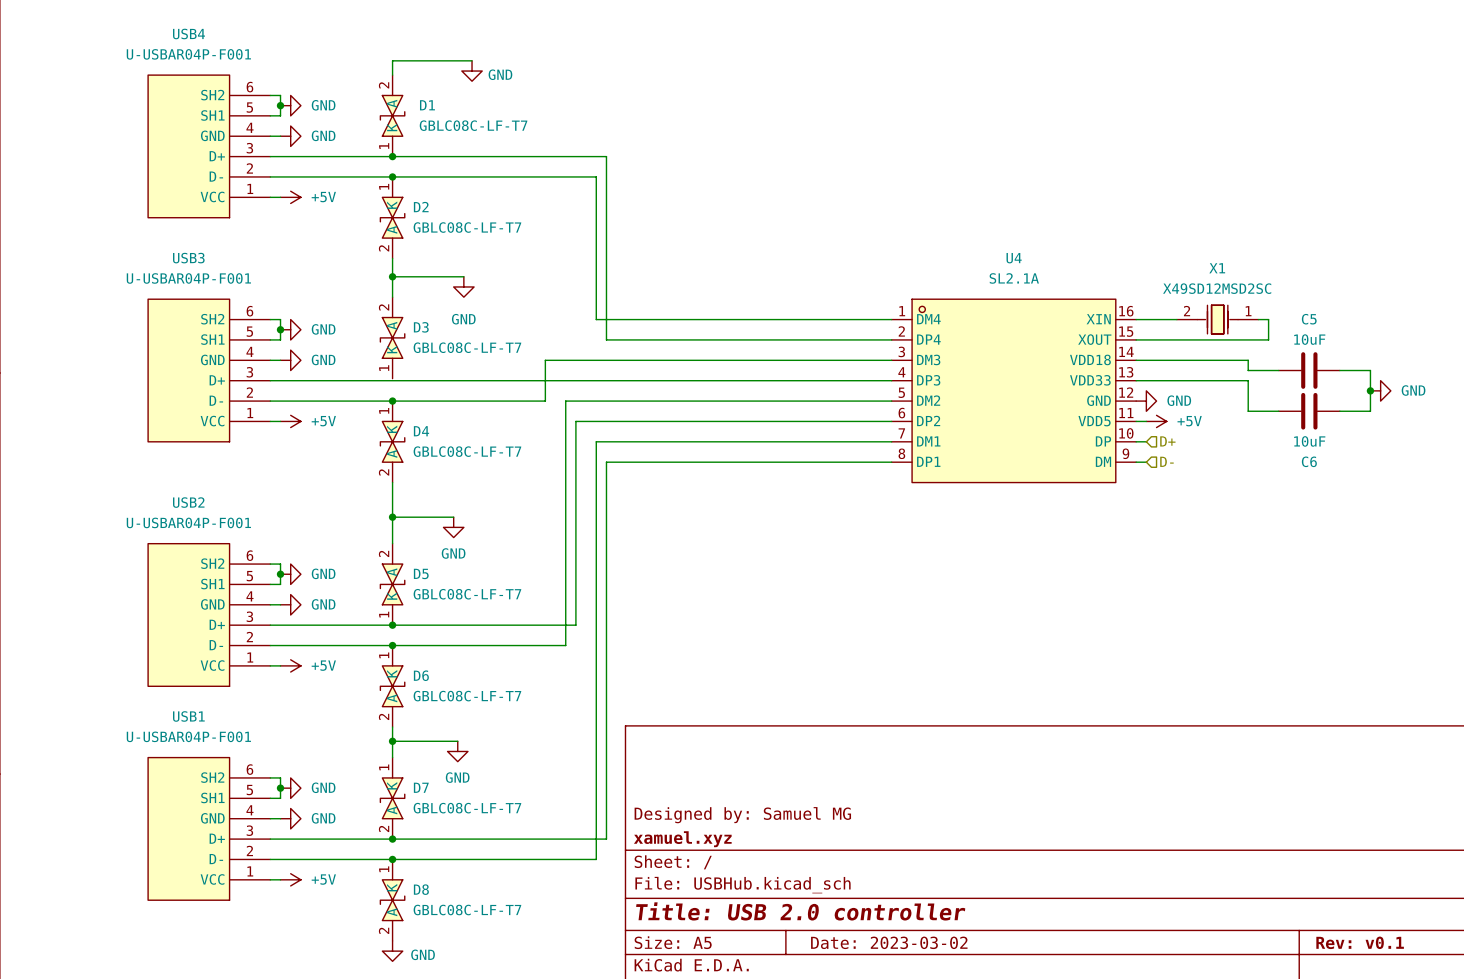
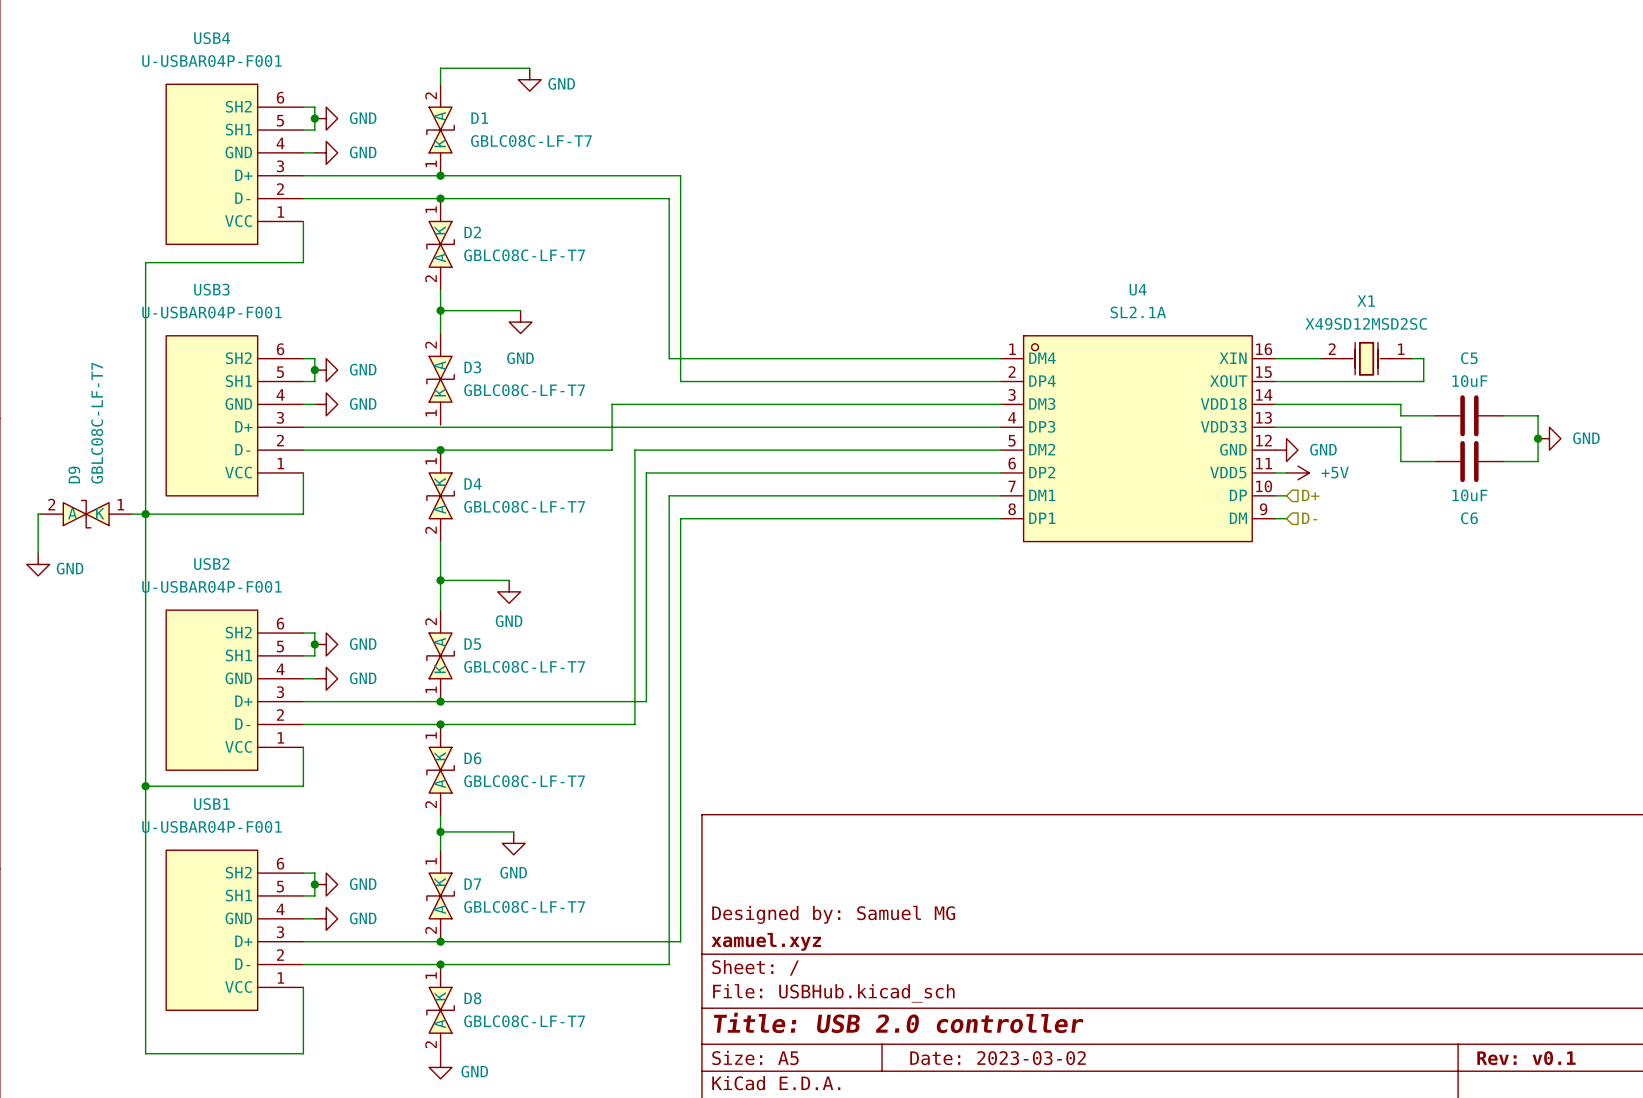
wire: (270, 197) (280, 197) -> (303, 221) (303, 262) (145, 262) (145, 1053) (303, 1053) (303, 987)
power symbol: +5V (290, 197) -> none
wire: (270, 421) (280, 421) -> (303, 472) (303, 514) (131, 514)
power symbol: +5V (290, 421) -> none
wire: none -> (40, 514) (38, 514) (38, 553)
D9: none -> GBLC08C-LF-T7 (86, 514)
junction: none -> (145, 514)
power symbol: none -> GND (38, 564)
wire: (270, 665) (280, 665) -> (303, 747) (303, 786) (145, 786)
power symbol: +5V (290, 665) -> none
junction: none -> (145, 786)
wire: (270, 879) (280, 879) -> none
power symbol: +5V (290, 879) -> none

